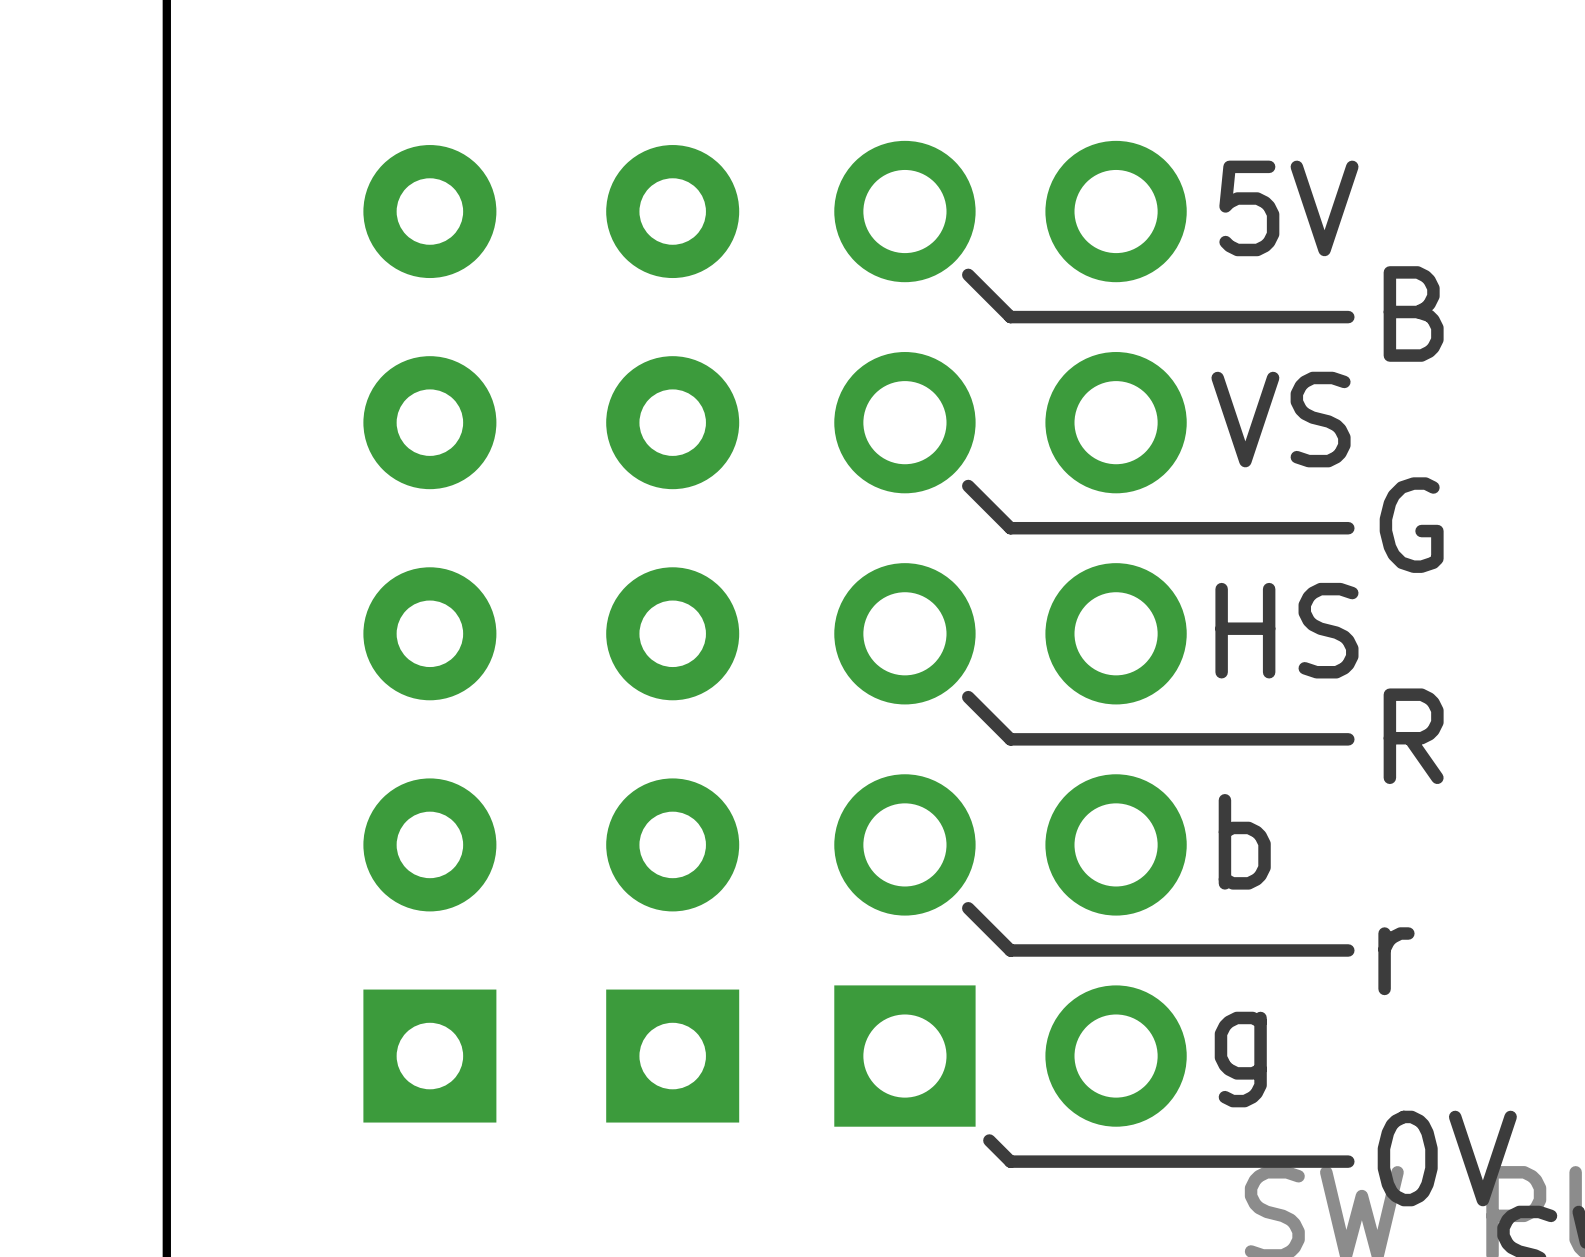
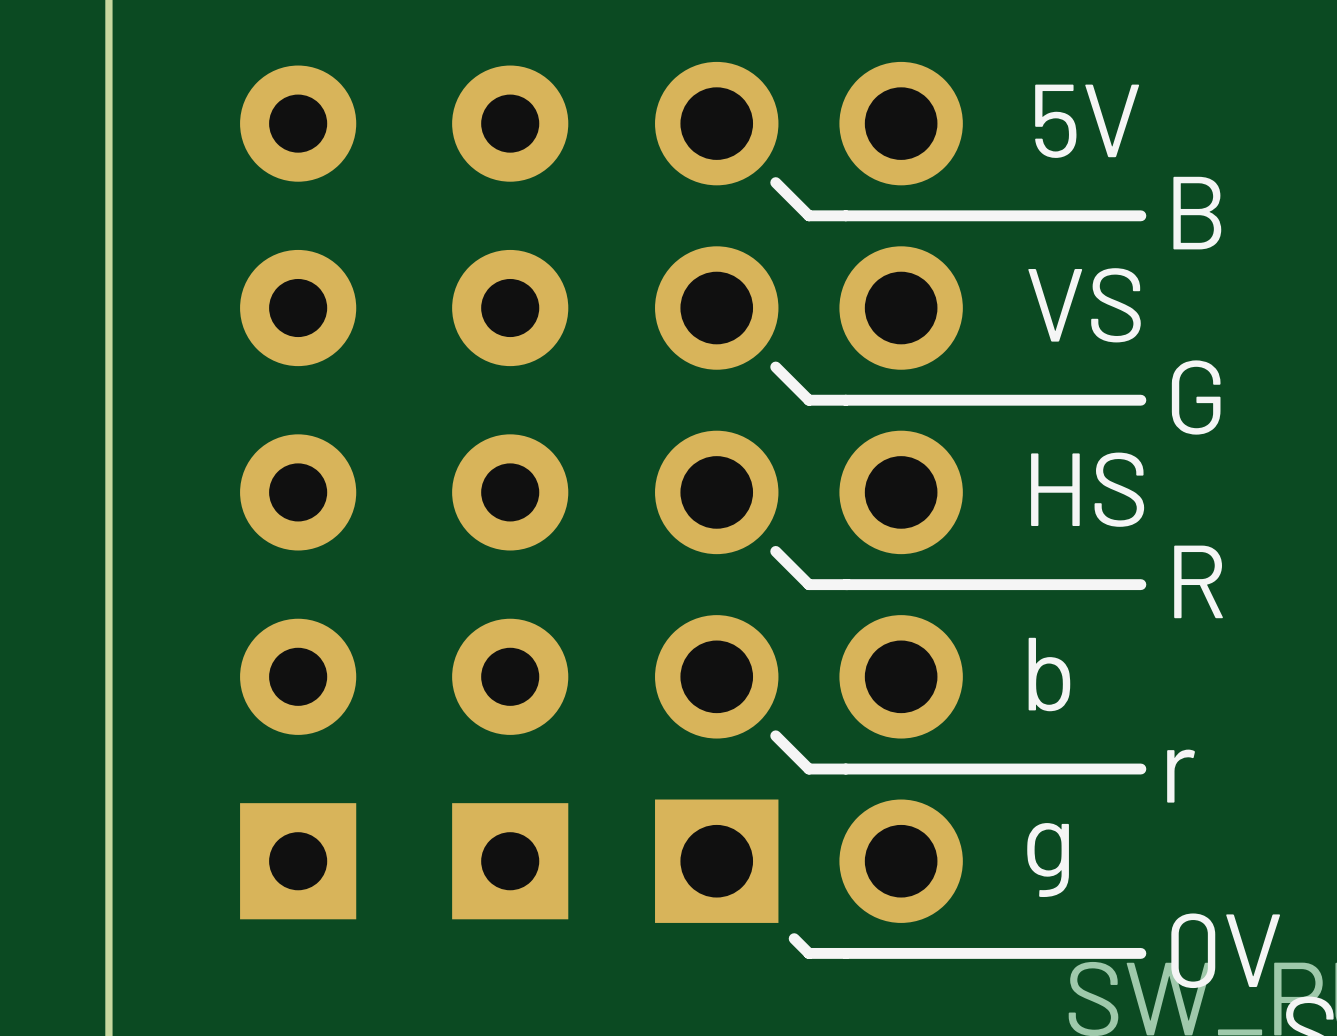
line: (968, 274) (1010, 317) -> (775, 182) (808, 215) (845, 215)
line: (968, 485) (1010, 528) -> (775, 367) (808, 400) (845, 400)
part position: (429, 633) -> (298, 492)
part position: (672, 633) -> (510, 492)
part position: (1010, 633) -> (808, 492)
line: (968, 697) (1010, 739) -> (775, 551) (808, 584) (845, 584)
line: (968, 908) (1010, 950) -> (775, 735) (808, 769) (845, 769)
line: (989, 1140) (1010, 1161) -> (794, 938) (808, 953) (845, 953)

